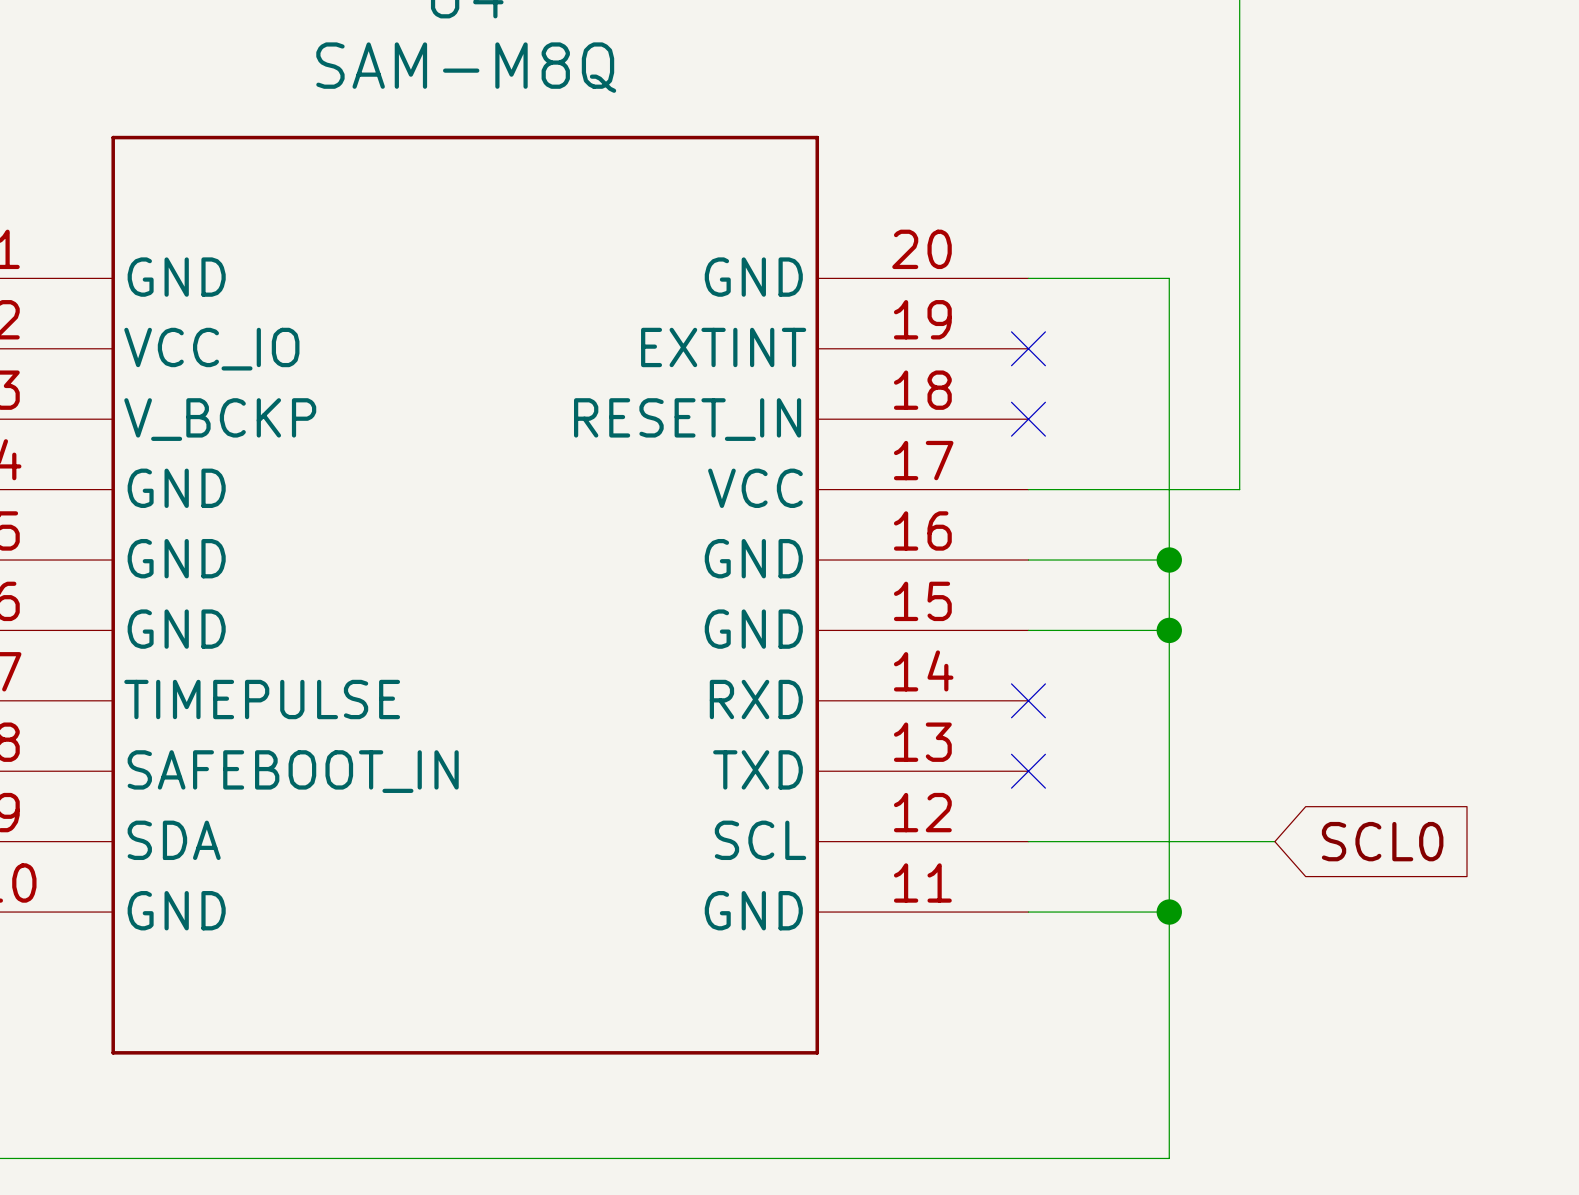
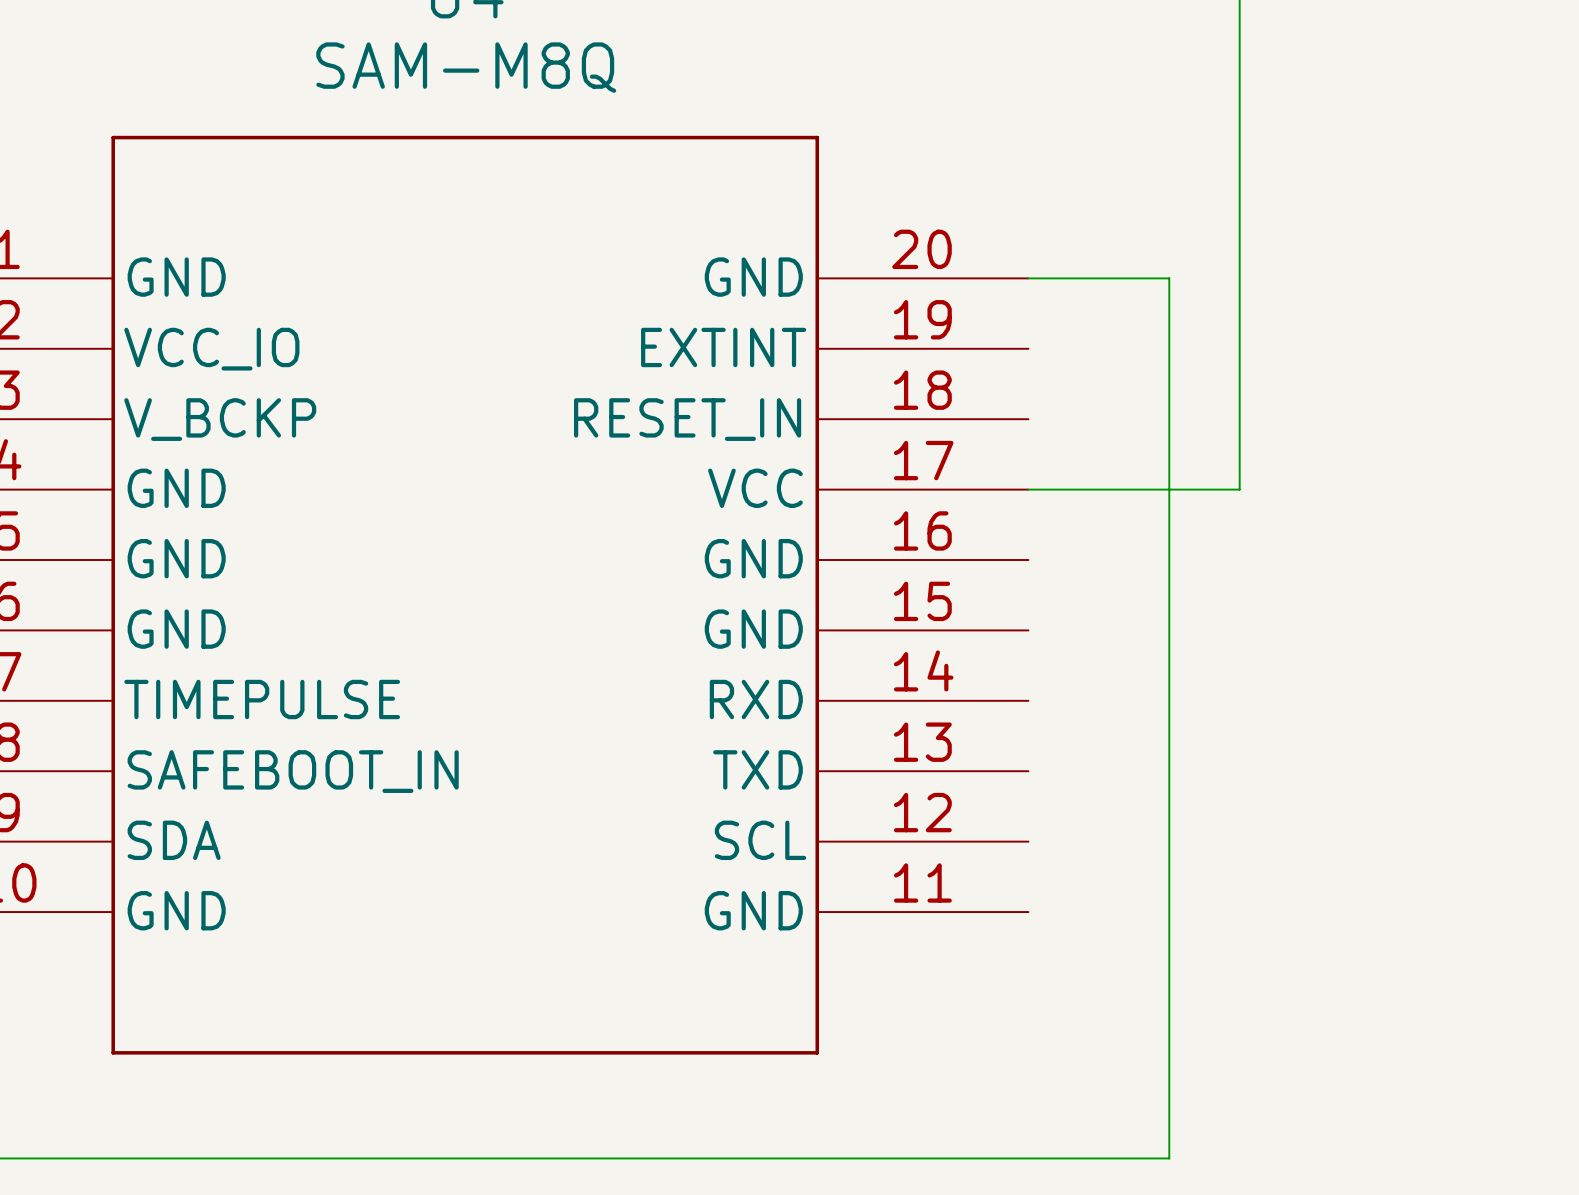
no-connect mark: (1028, 348) -> none
no-connect mark: (1028, 419) -> none
wire: (1028, 560) (1169, 560) -> none
junction: (1169, 560) -> none
wire: (1028, 630) (1169, 630) -> none
junction: (1169, 630) -> none
no-connect mark: (1028, 700) -> none
no-connect mark: (1028, 771) -> none
wire: (1028, 841) (1274, 841) -> none
global label: SCL0 (1382, 841) -> none
wire: (1028, 912) (1169, 912) -> none
junction: (1169, 912) -> none

